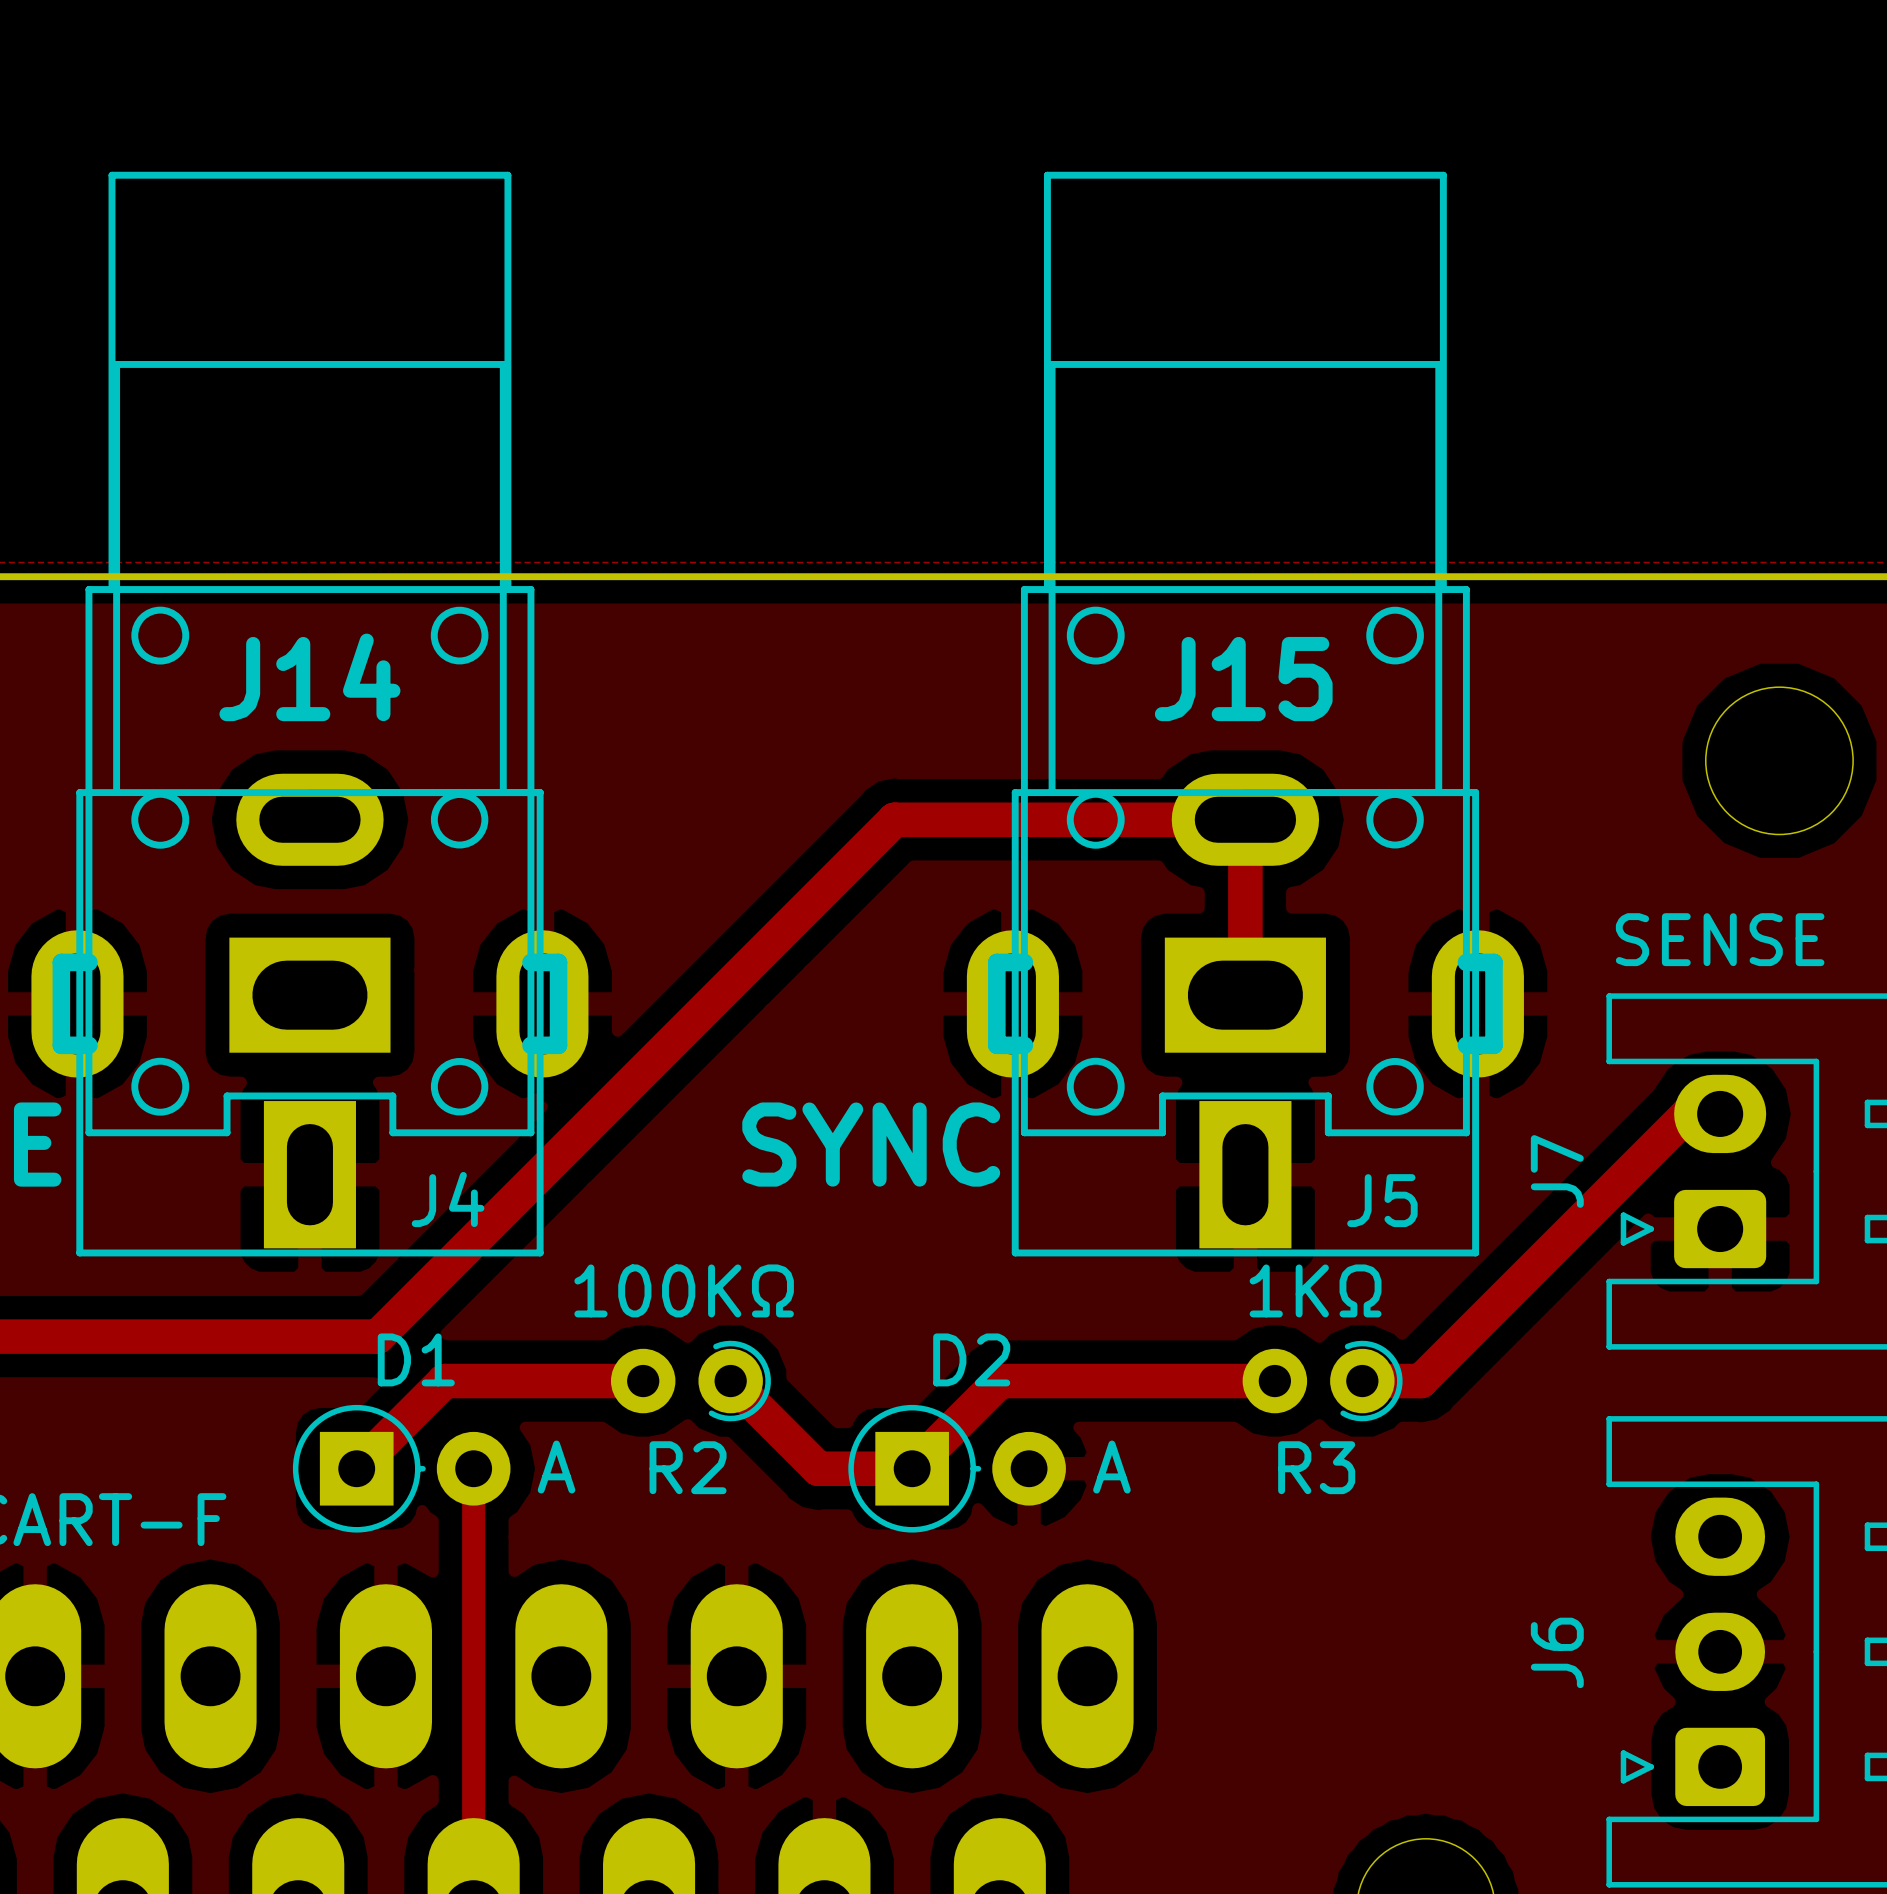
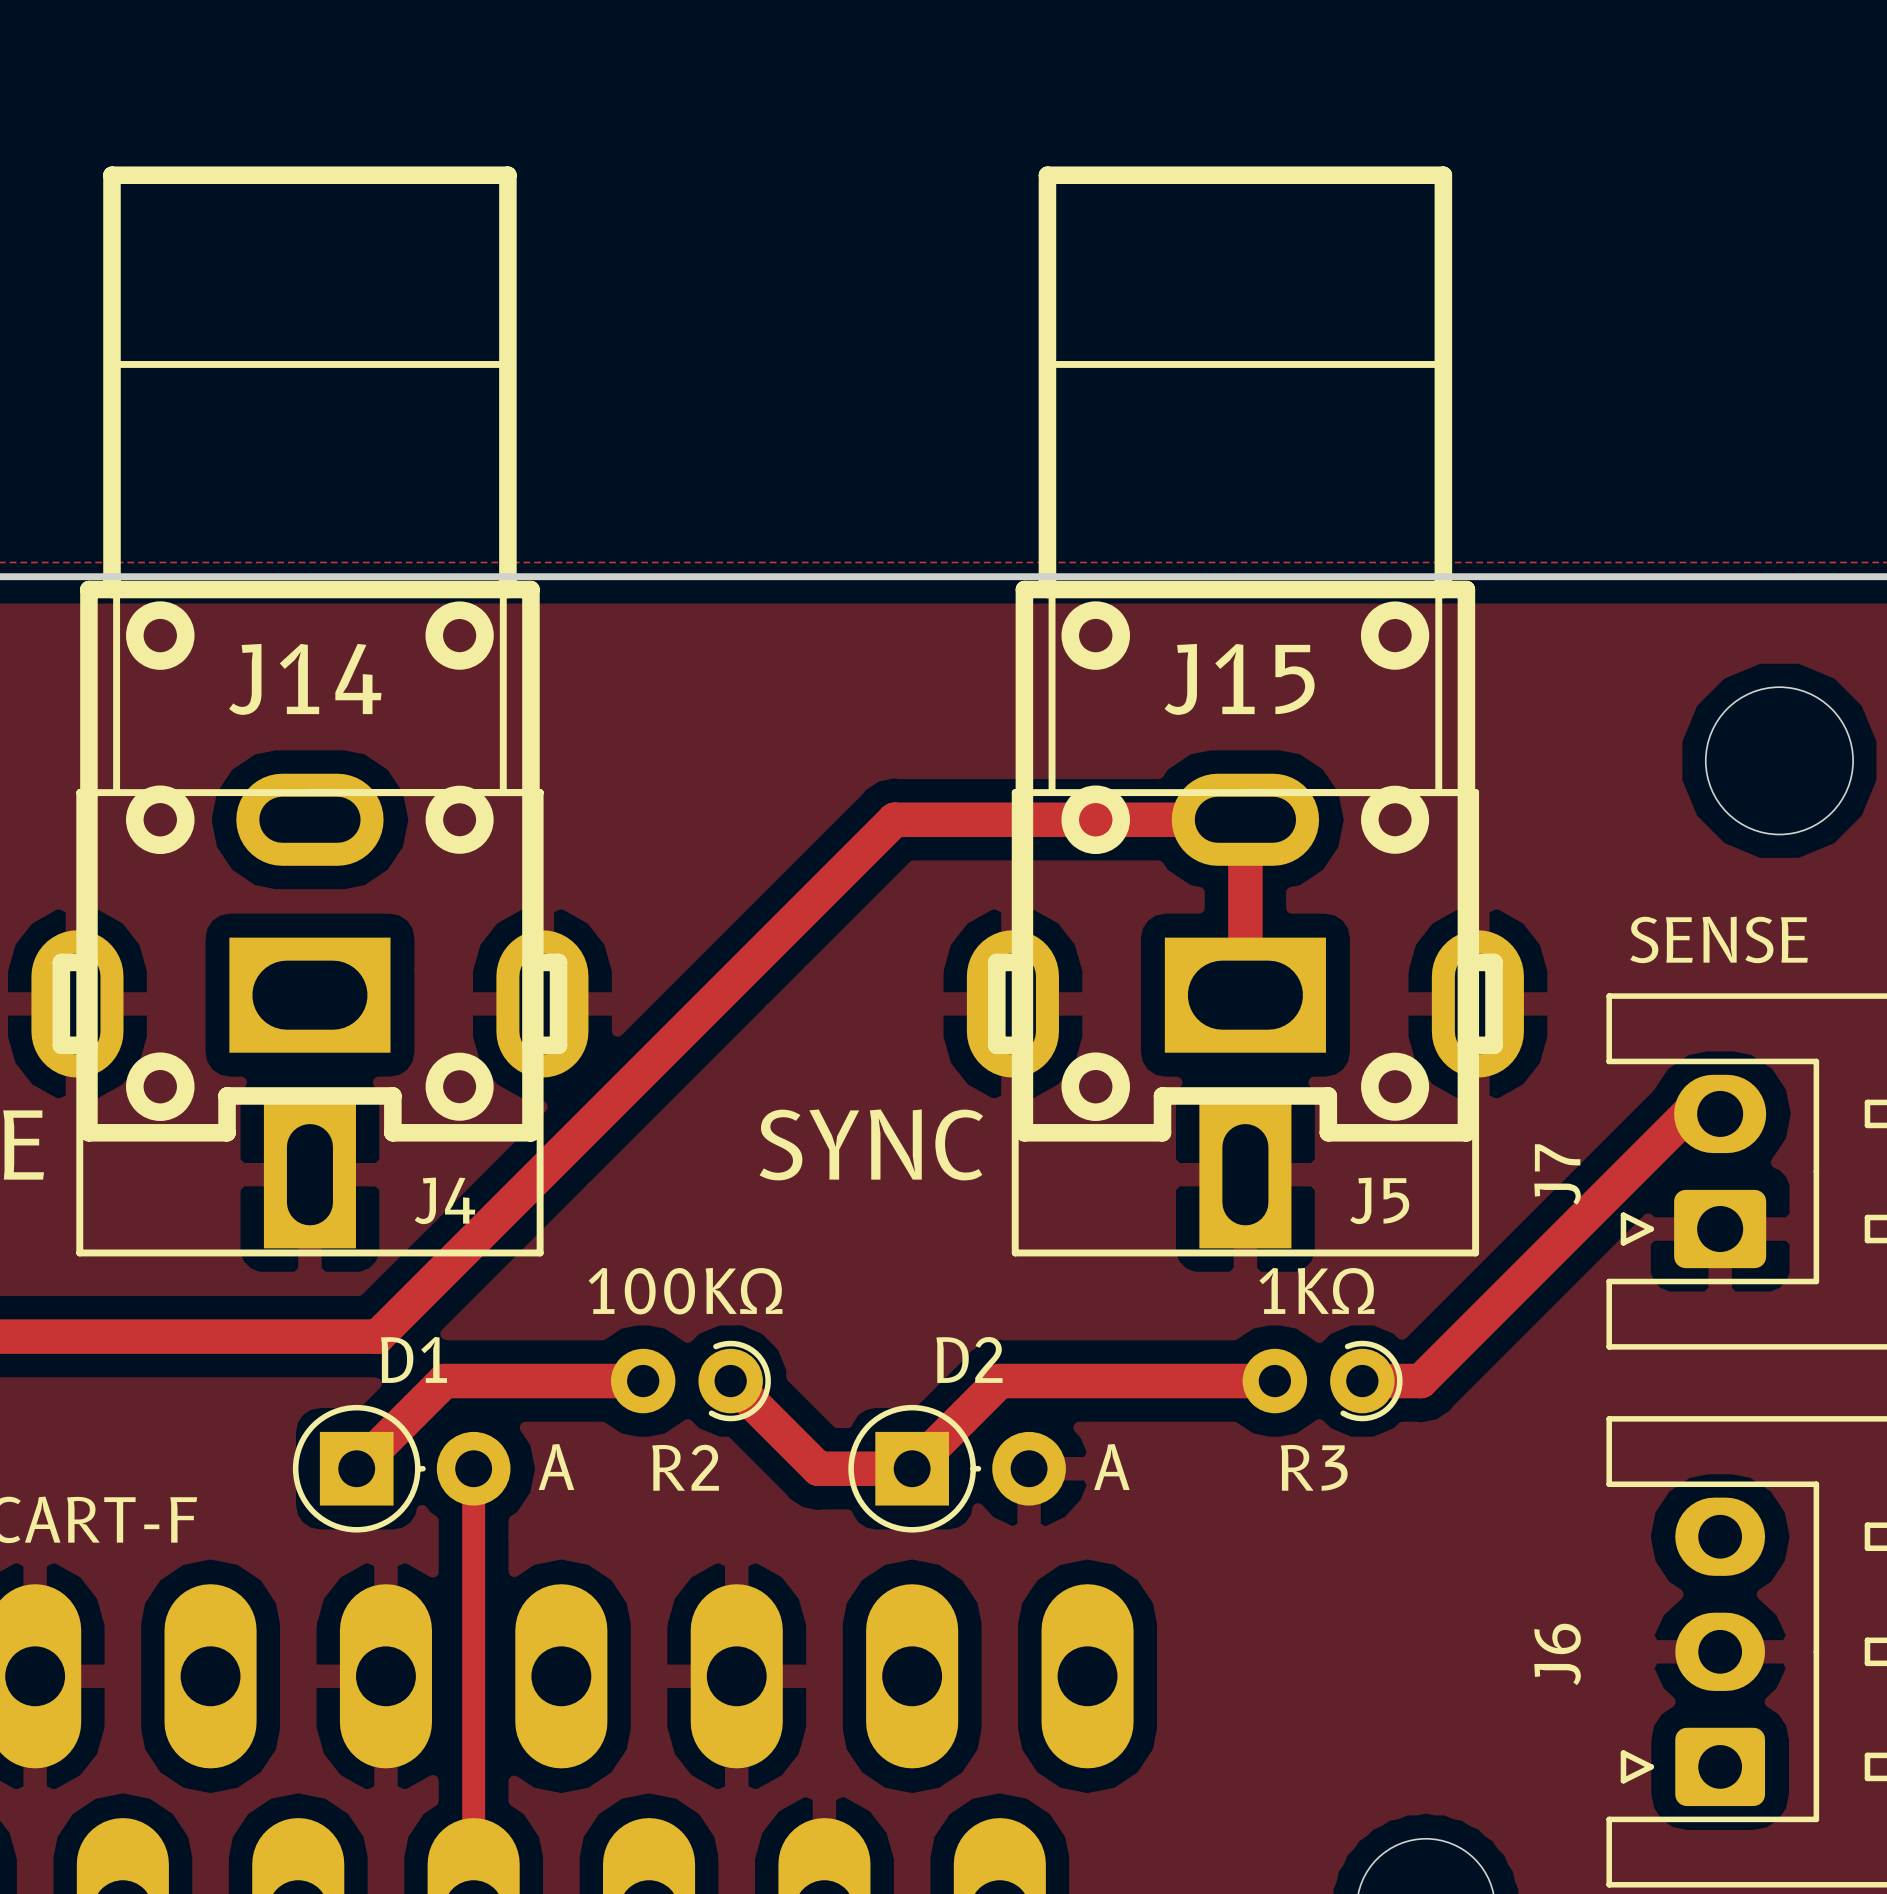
J14 footprint: [31, 171, 589, 1137] -> [31, 166, 589, 1142]
J15 footprint: [966, 171, 1524, 1137] -> [966, 166, 1524, 1142]

